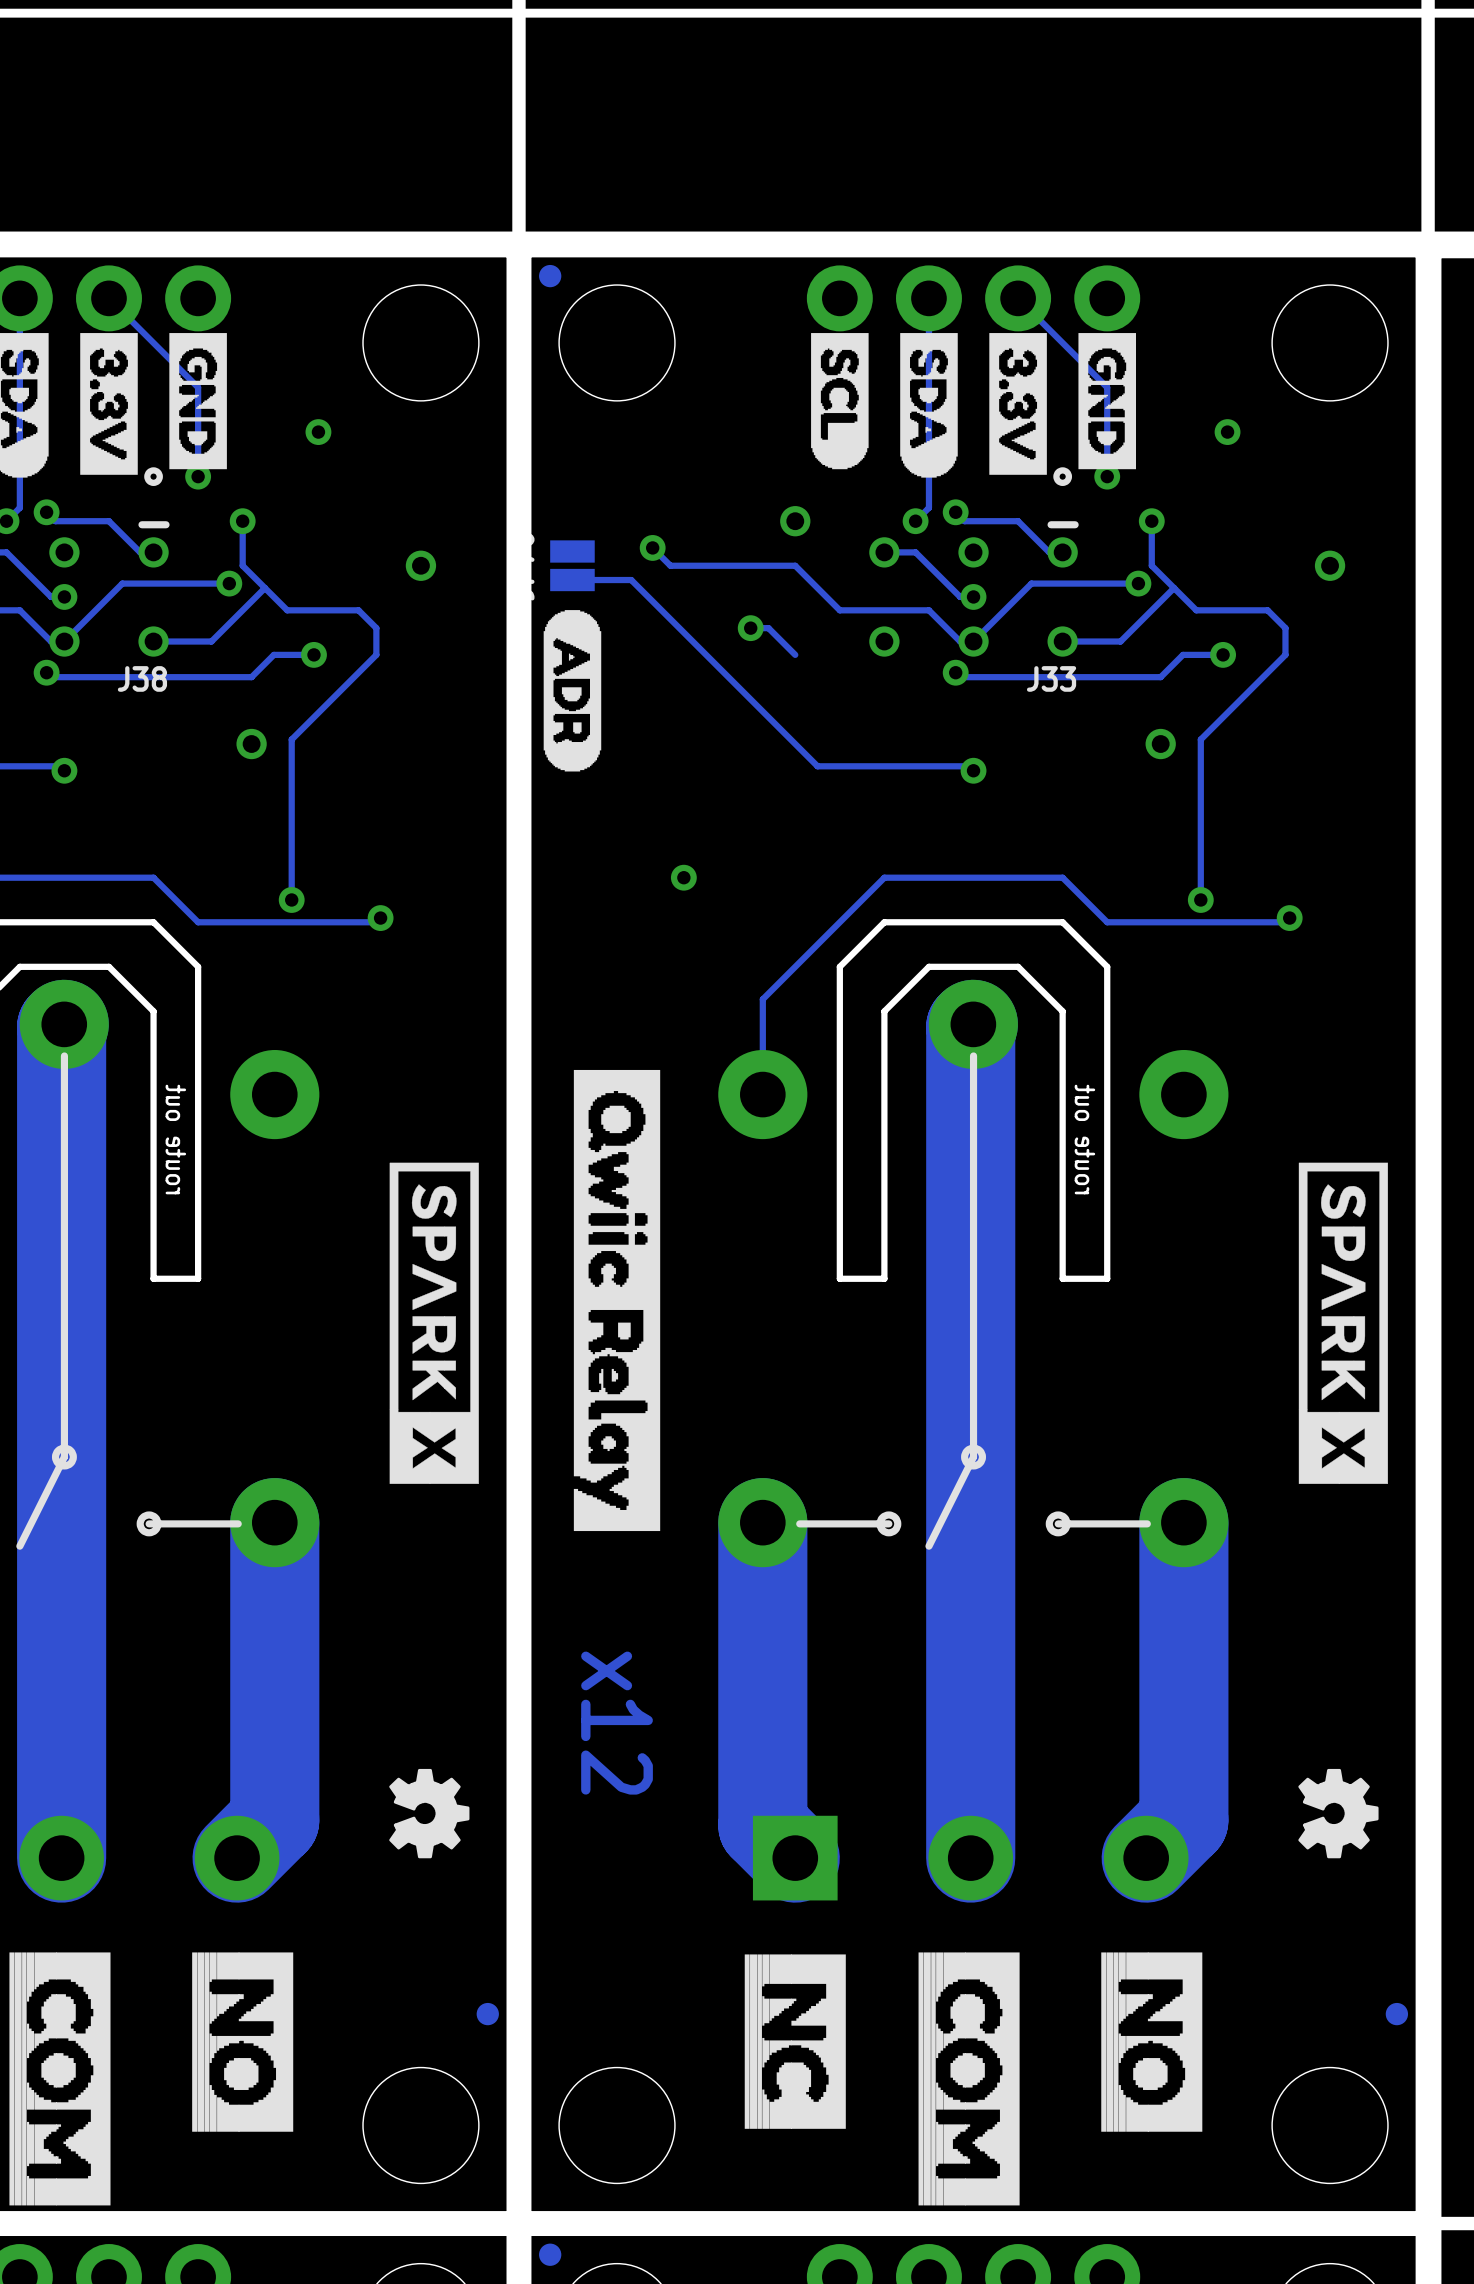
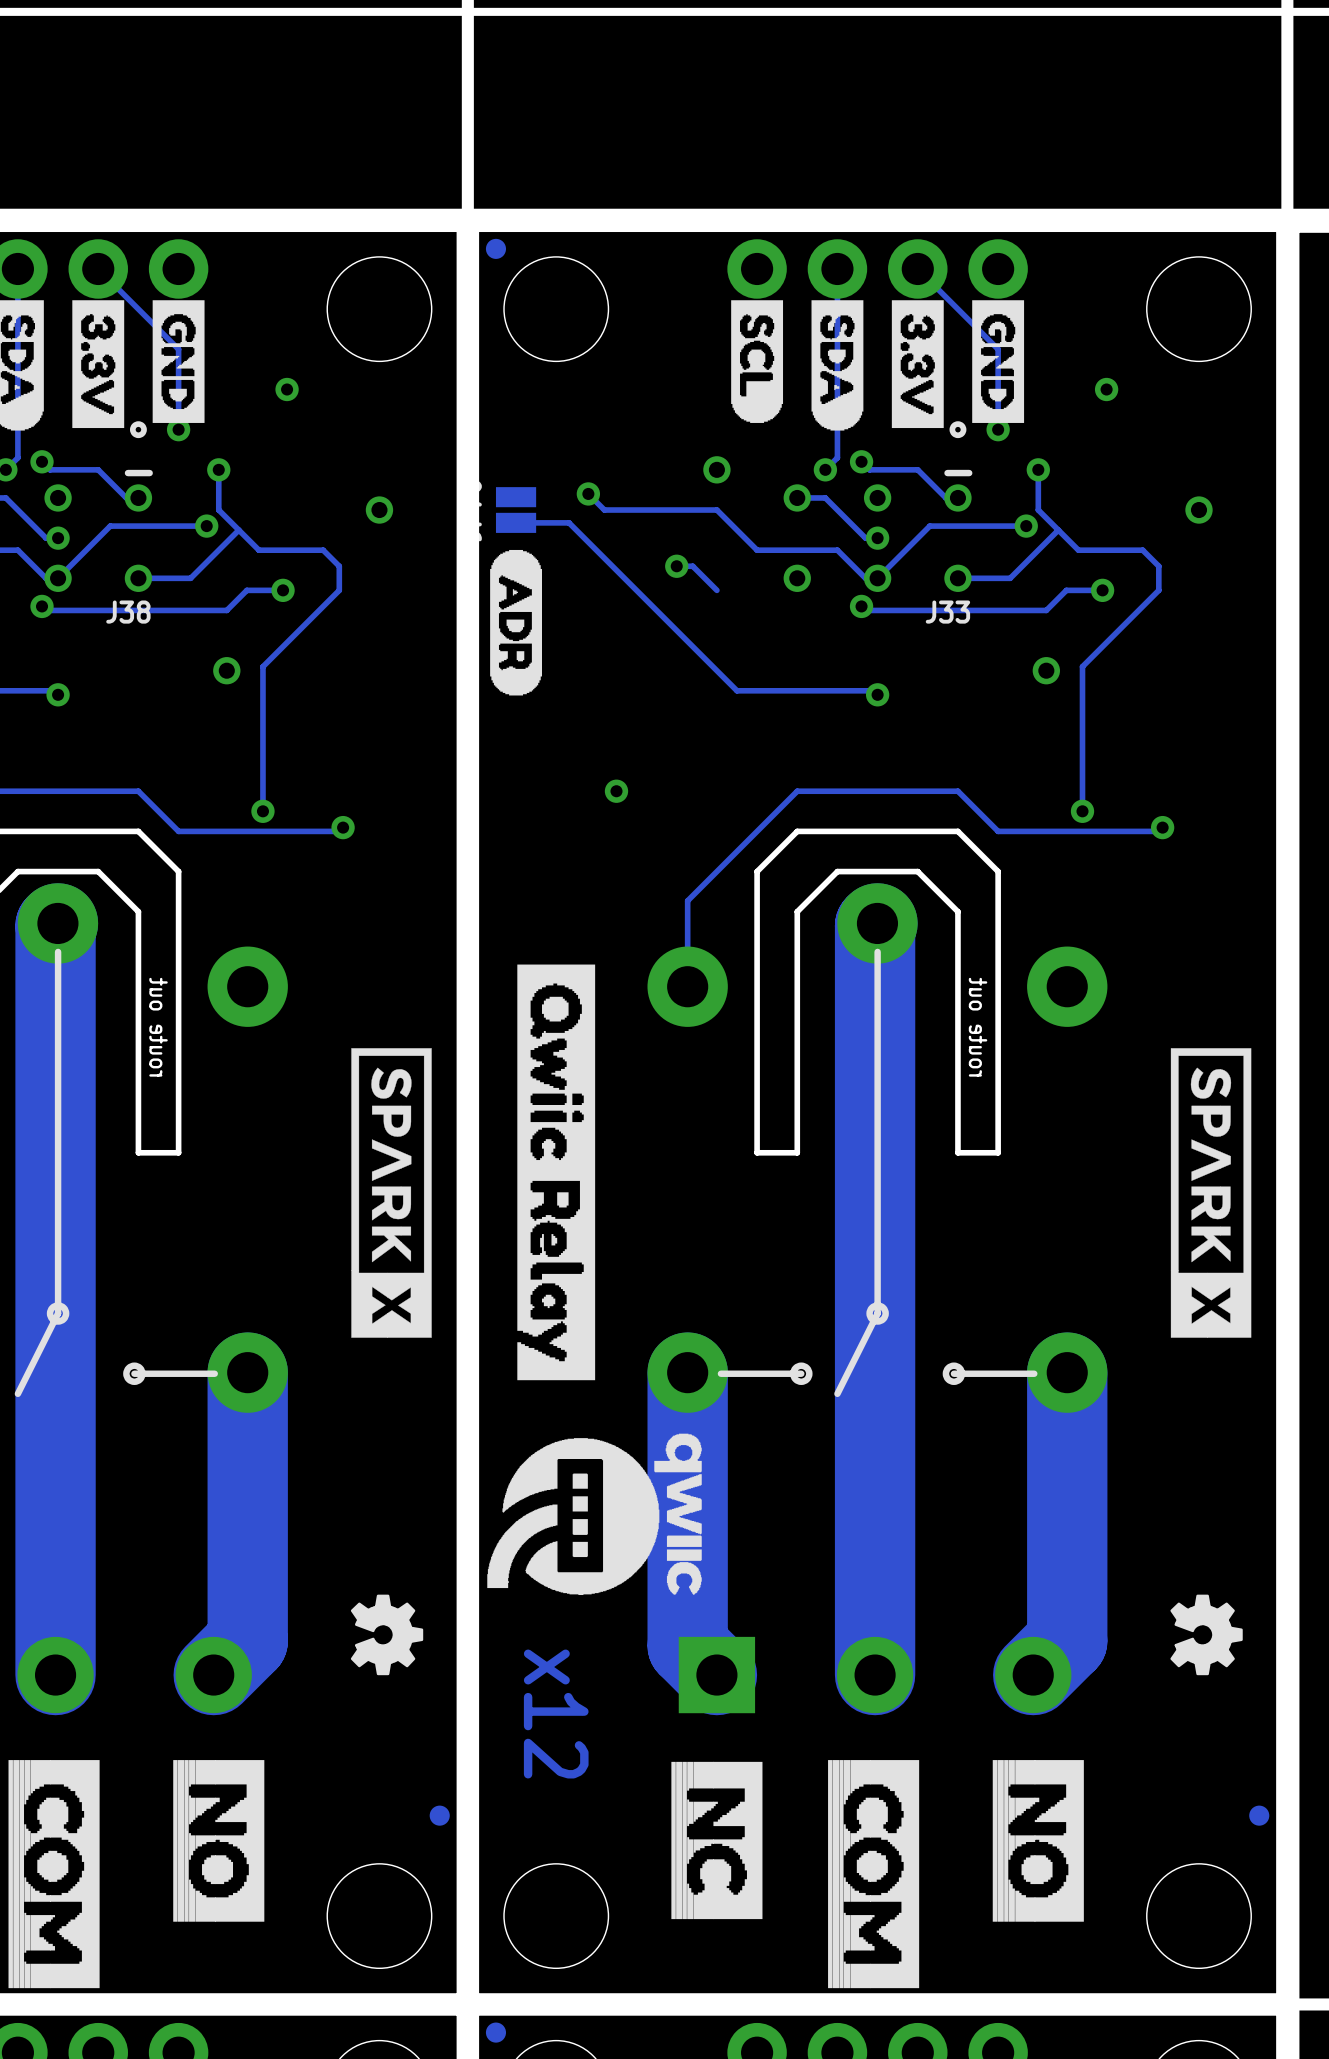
drawing: none -> [487, 1433, 702, 1596]
text position: x12 (617, 1723) -> x12 (556, 1714)

